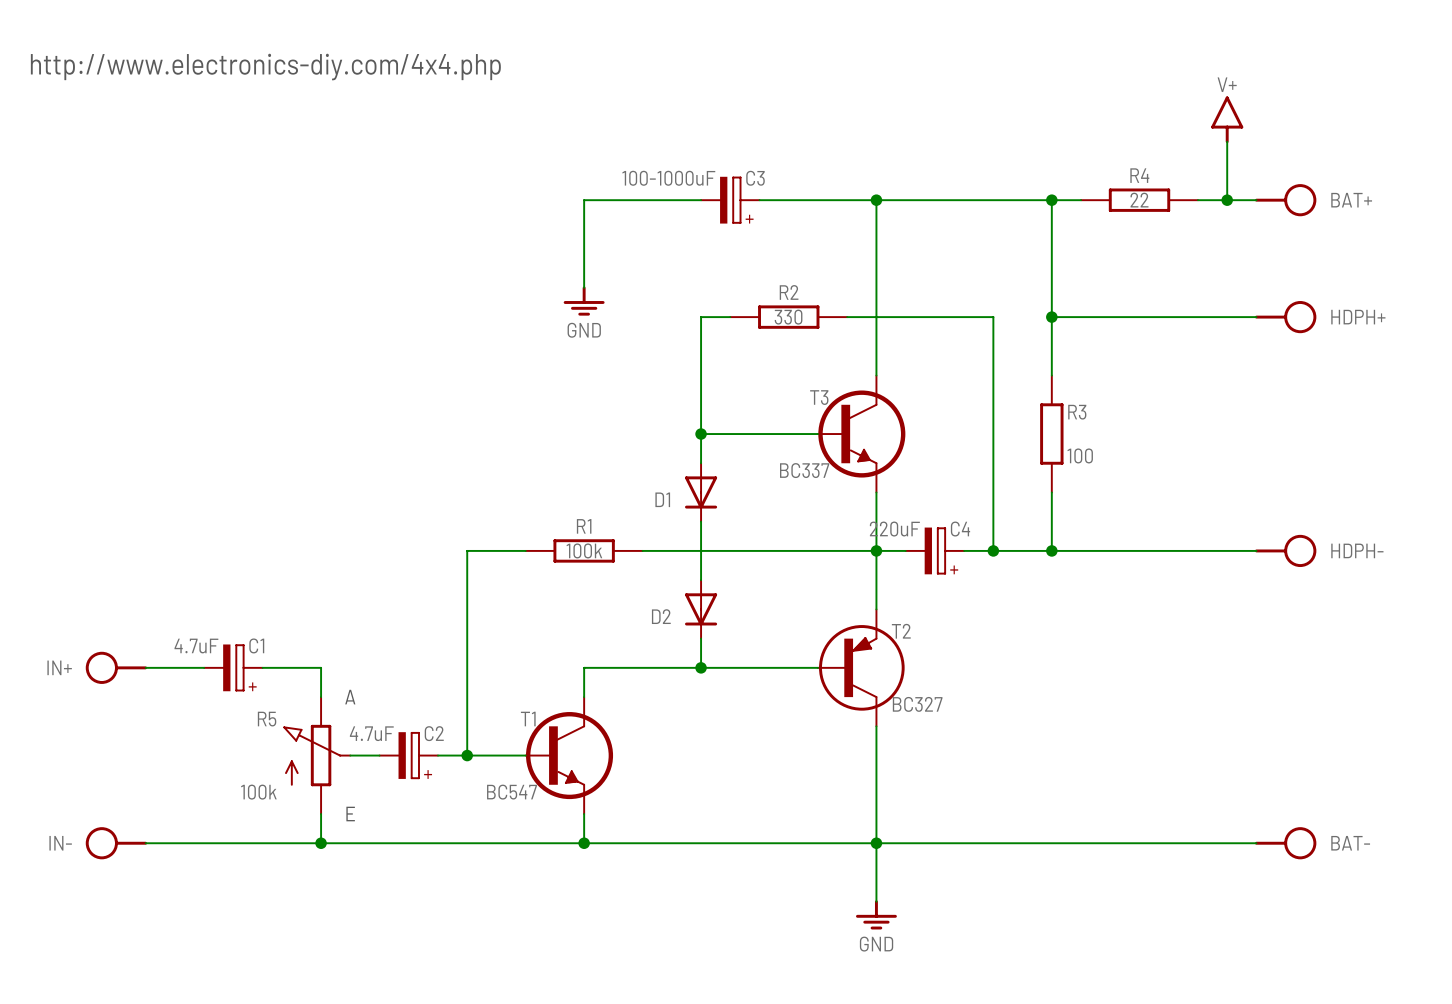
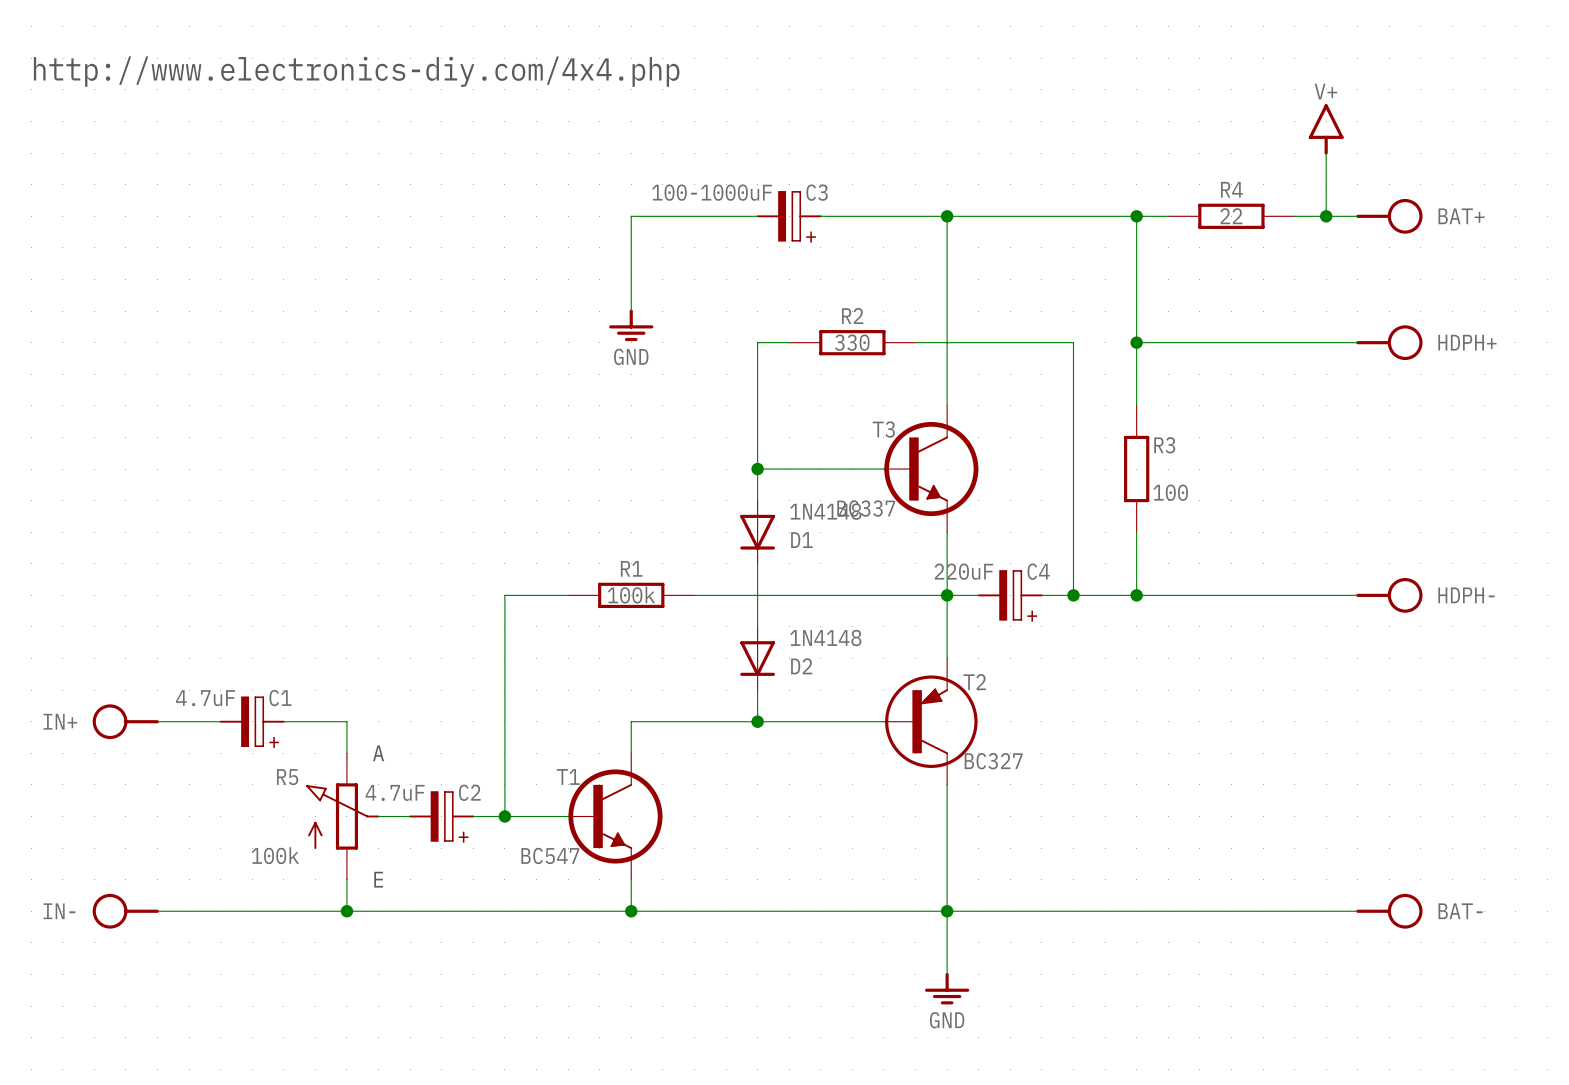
D1 value: none -> 1N4148 (825, 511)
D1 name position: D1 (662, 499) -> D1 (801, 540)
D2 value: none -> 1N4148 (825, 638)
D2 name position: D2 (661, 616) -> D2 (801, 666)

